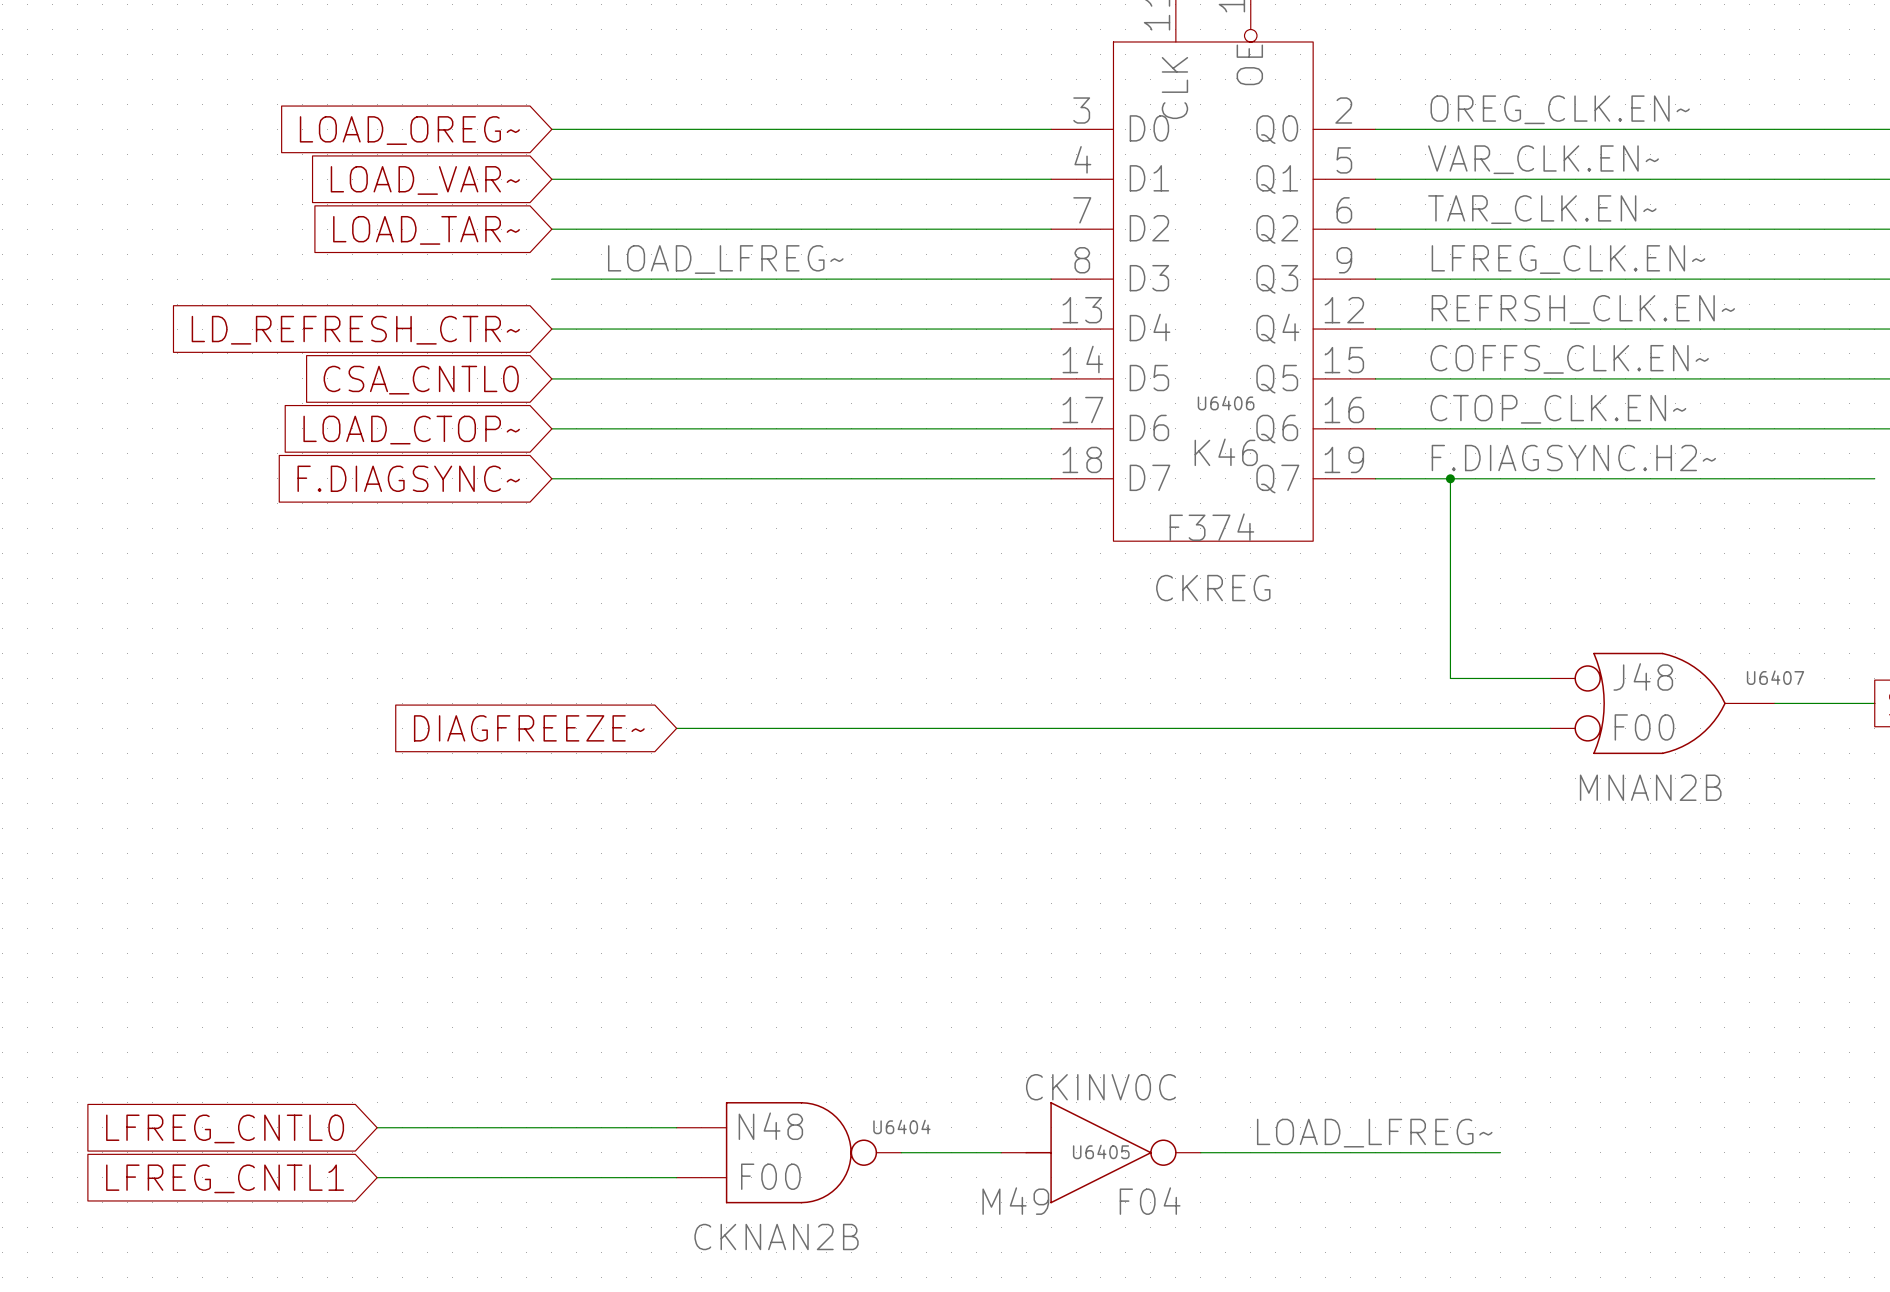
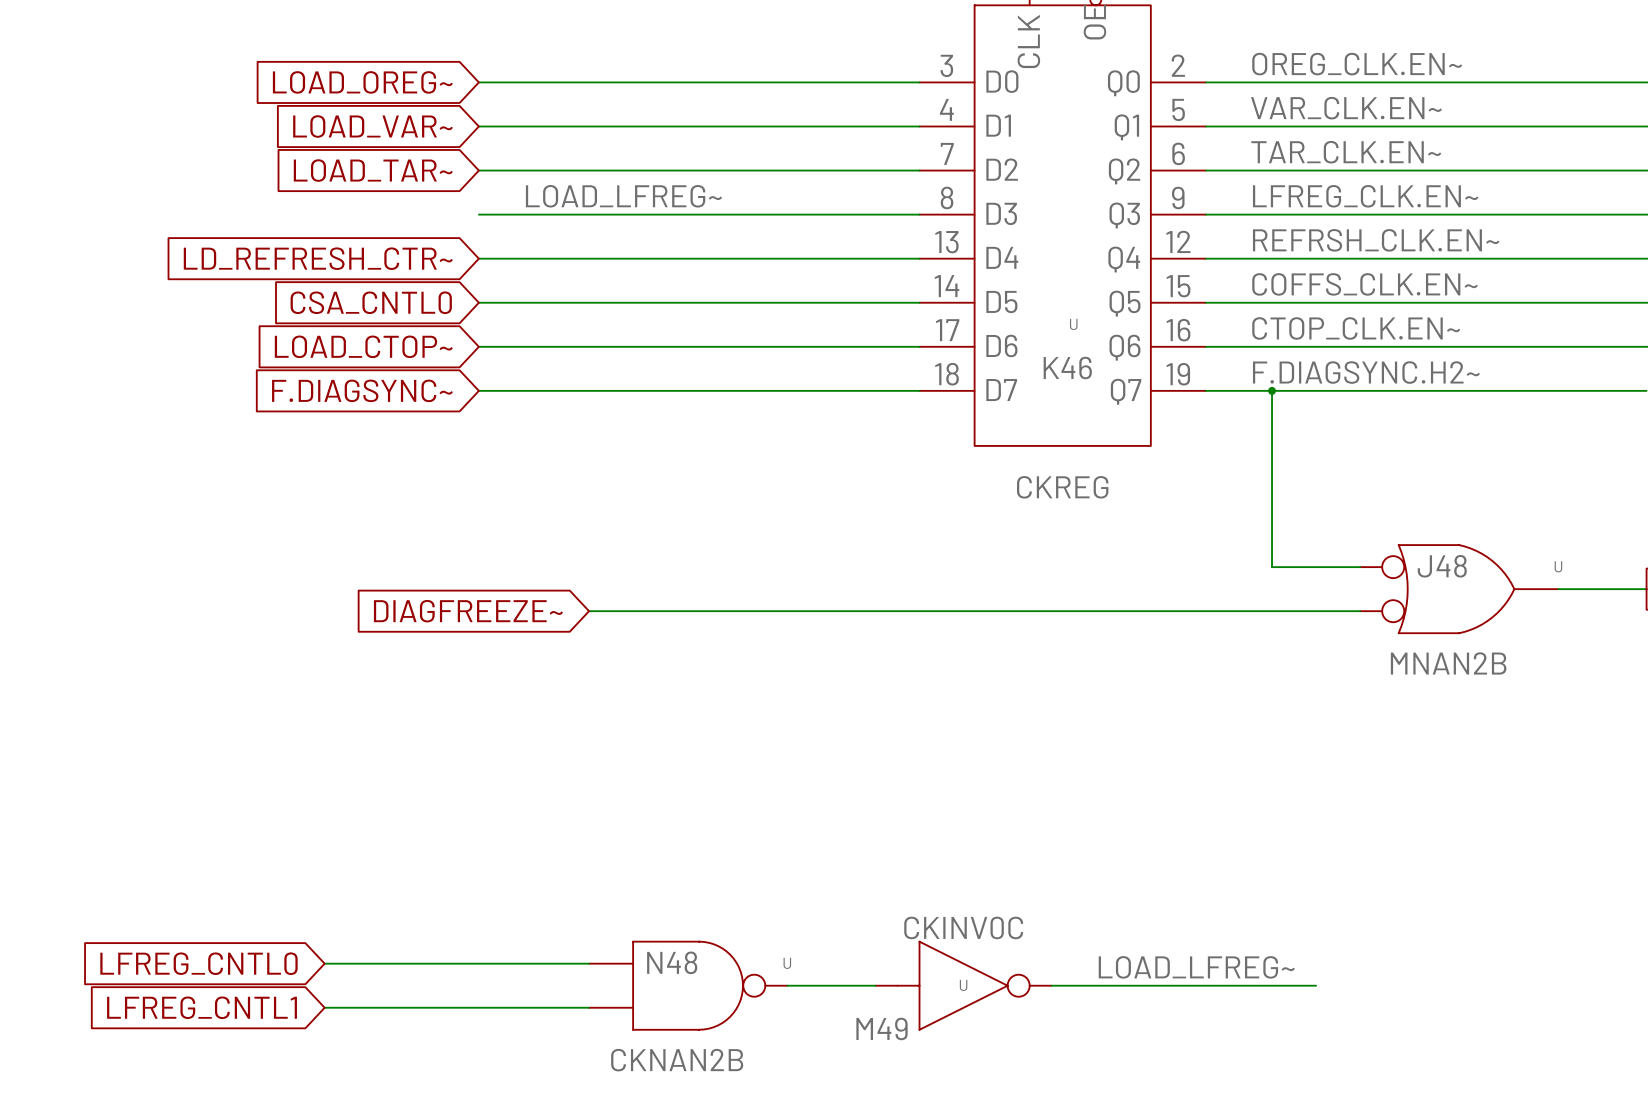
U6406 name: U6406 (1226, 403) -> U (1073, 324)
U6406 value: F374 (1211, 527) -> none
U6407 name: U6407 (1775, 677) -> U (1558, 566)
U6407 value: F00 (1644, 727) -> none
U6404 name: U6404 (901, 1126) -> U (787, 963)
U6405 name: U6405 (1101, 1151) -> U (963, 985)
U6404 value: F00 (770, 1176) -> none
U6405 value: F04 (1150, 1201) -> none

